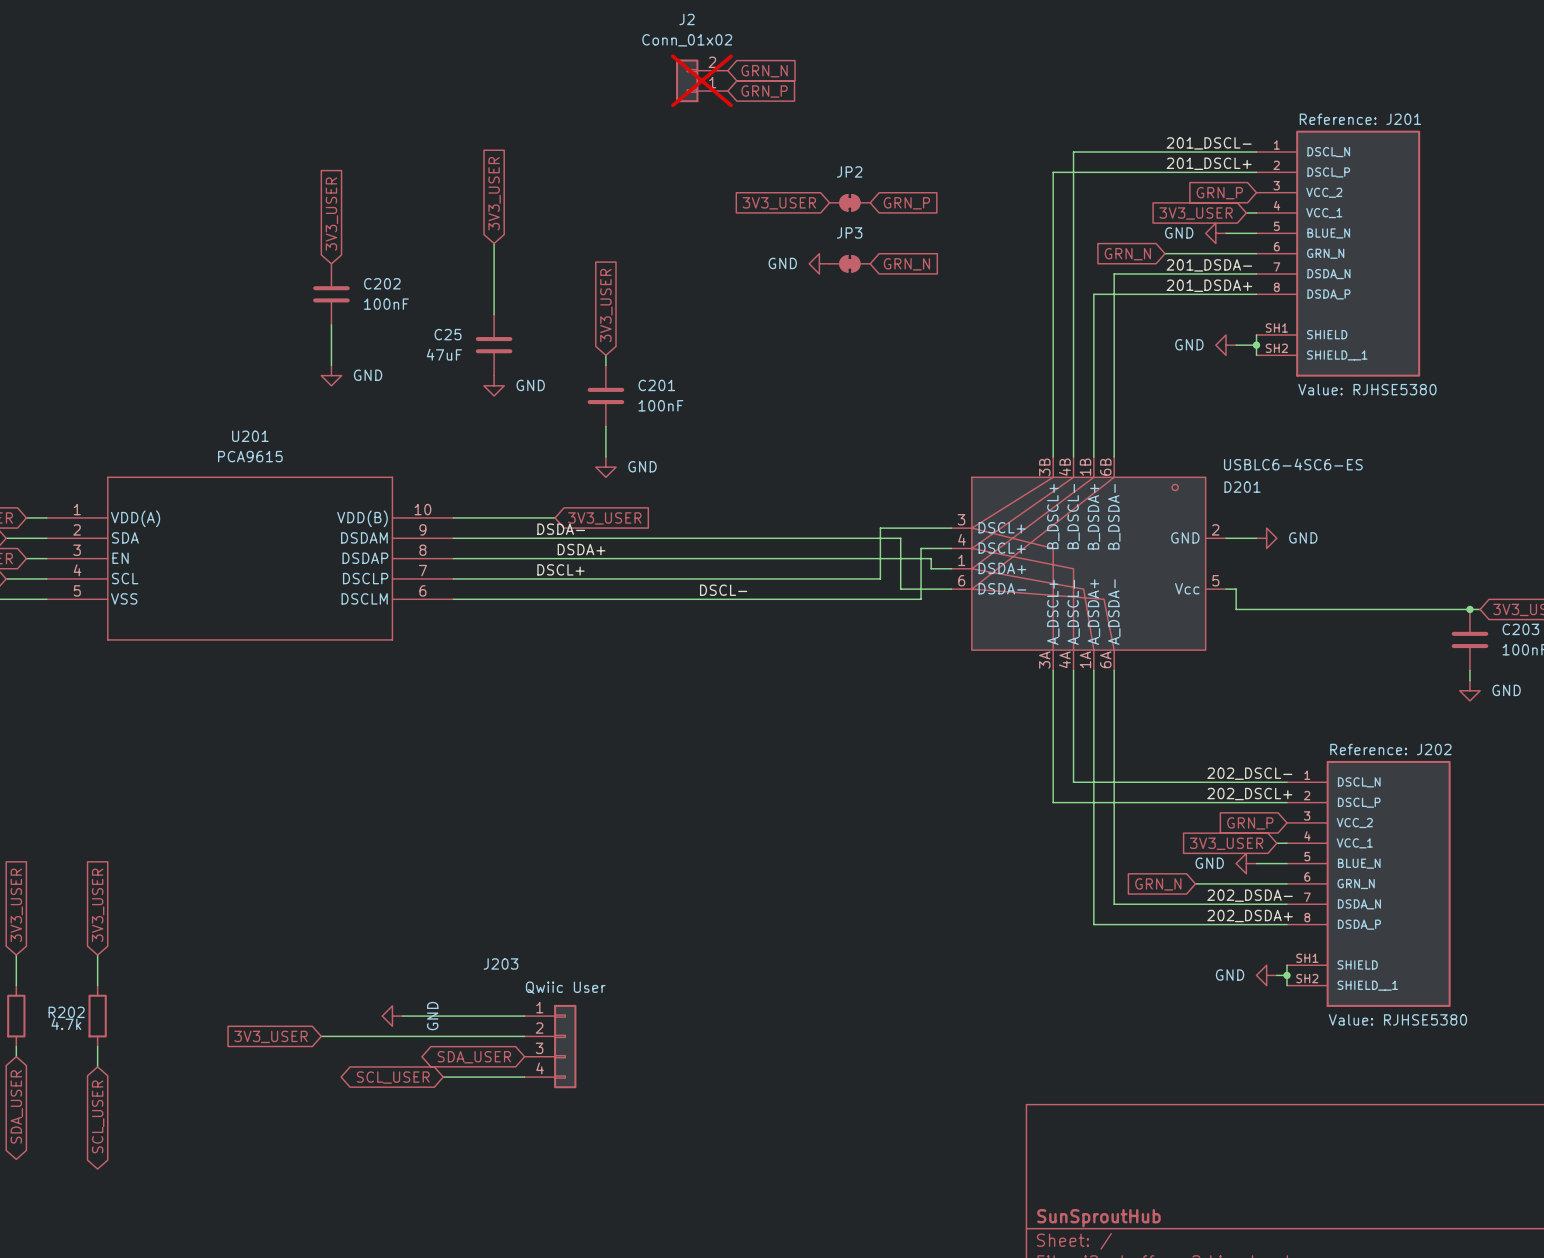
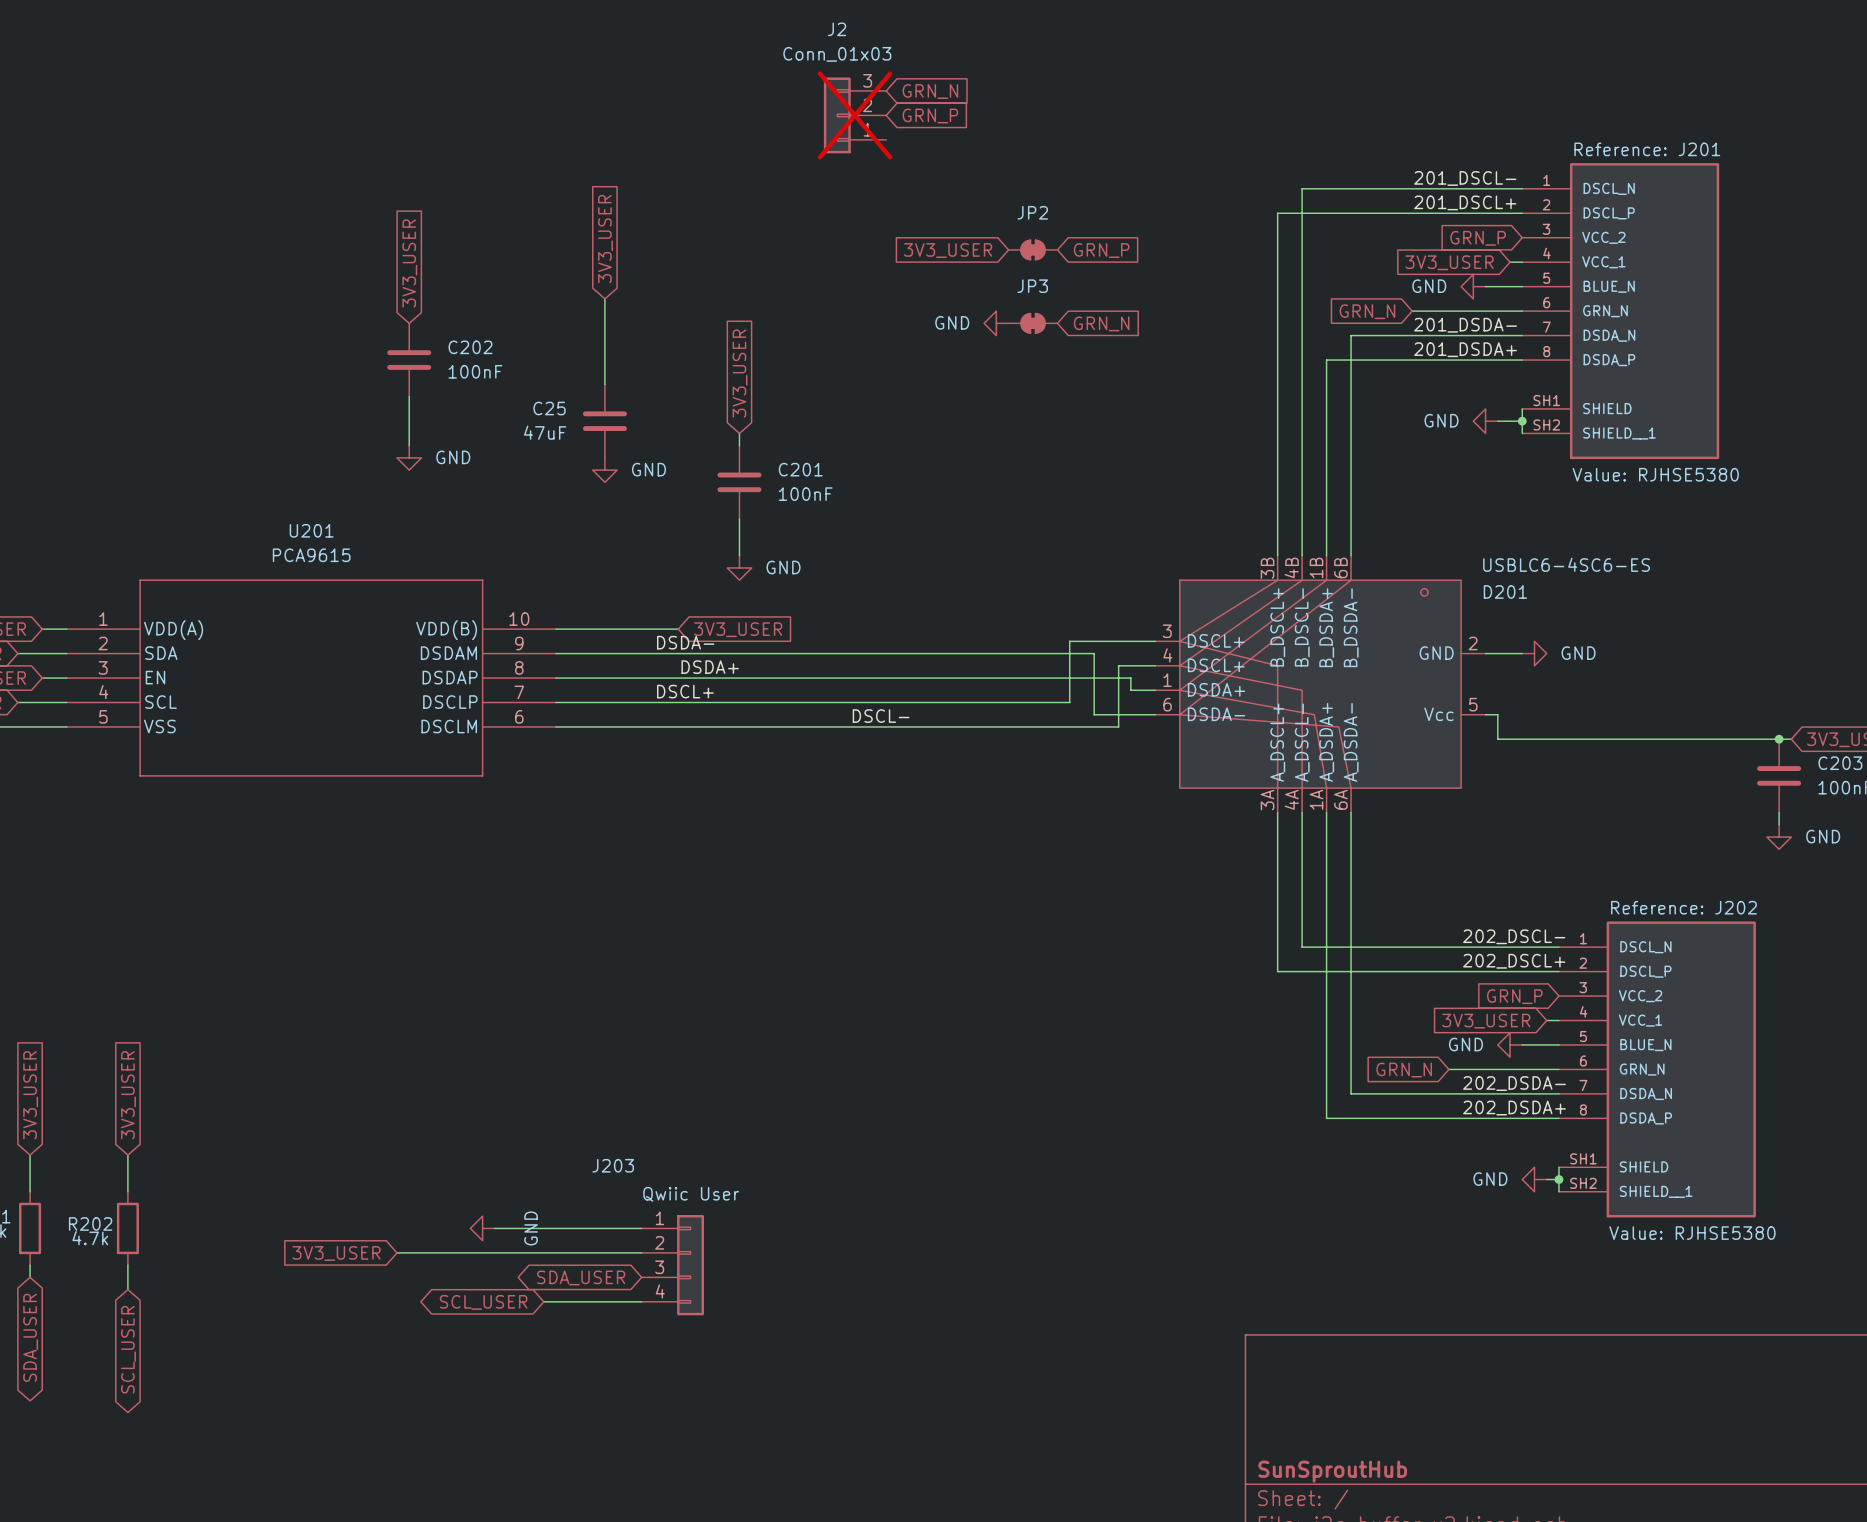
J2 value: Conn_01x02 (687, 40) -> Conn_01x03 (837, 54)
J2 symbol: [676, 59, 728, 103] -> [823, 77, 887, 154]

